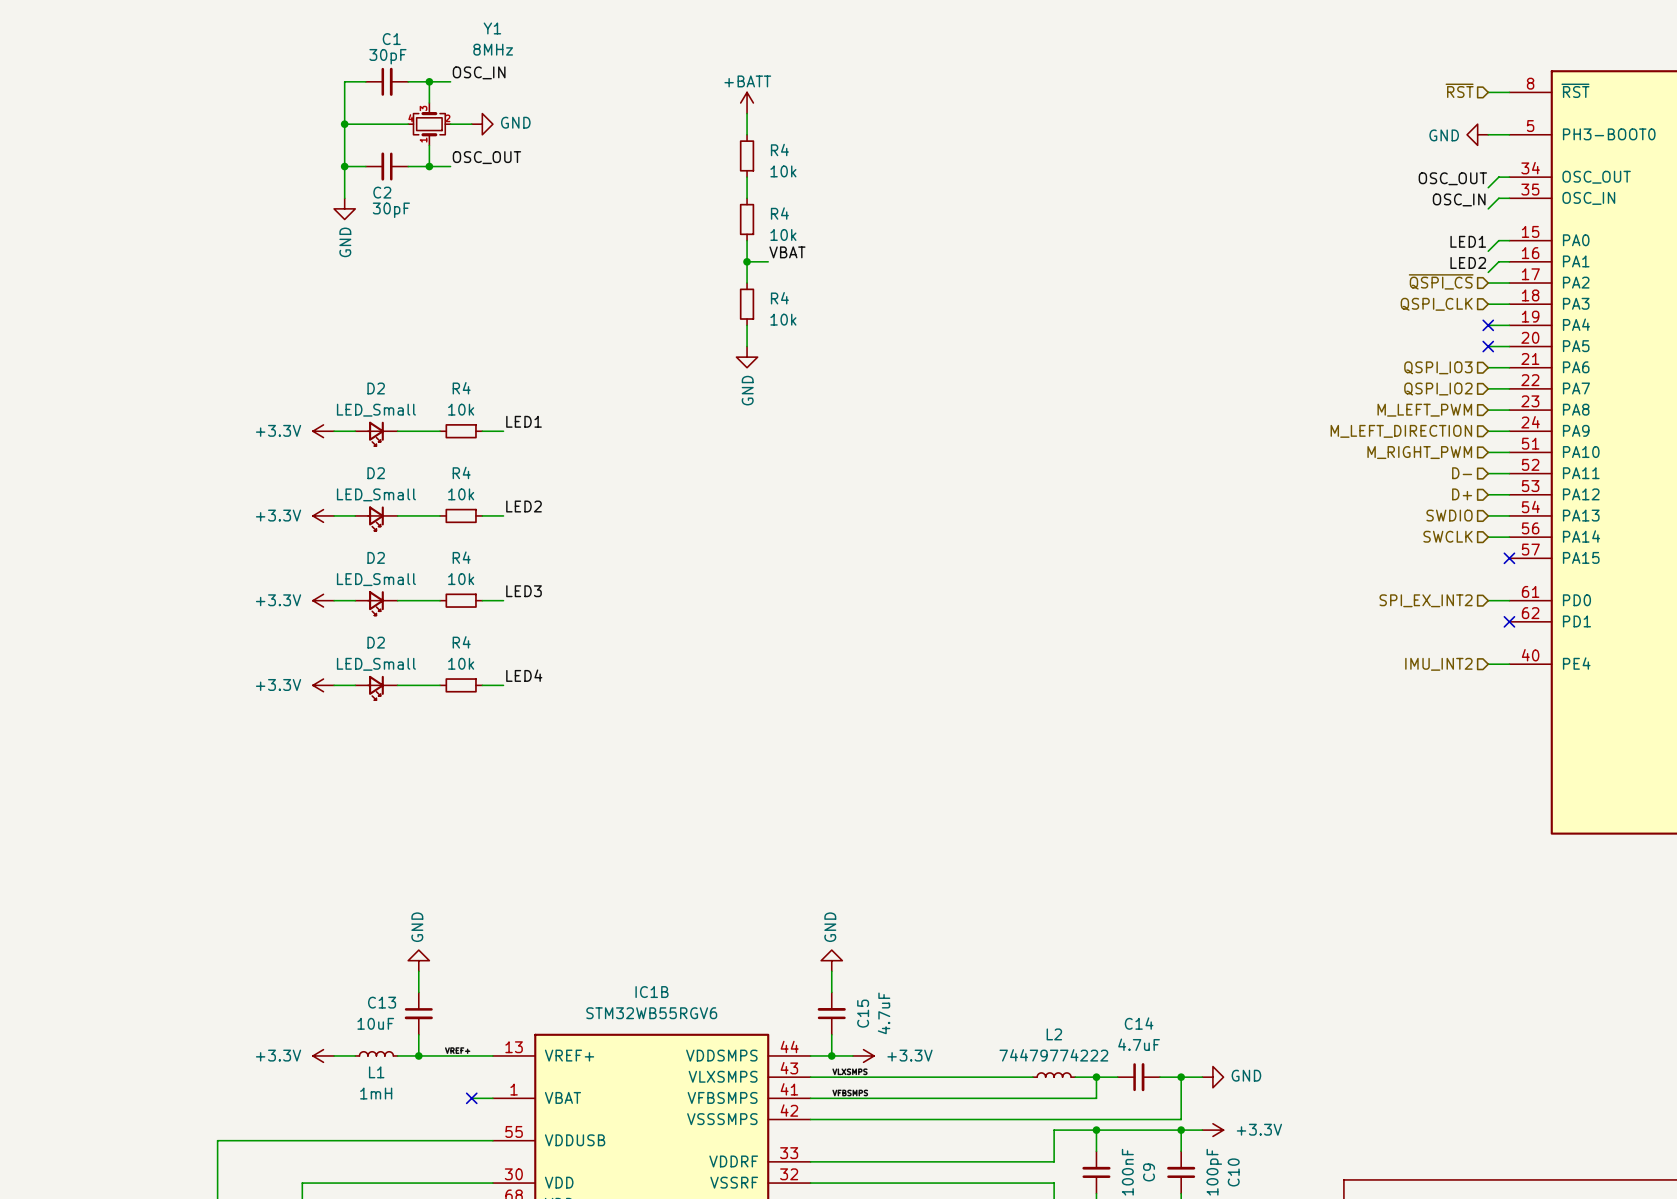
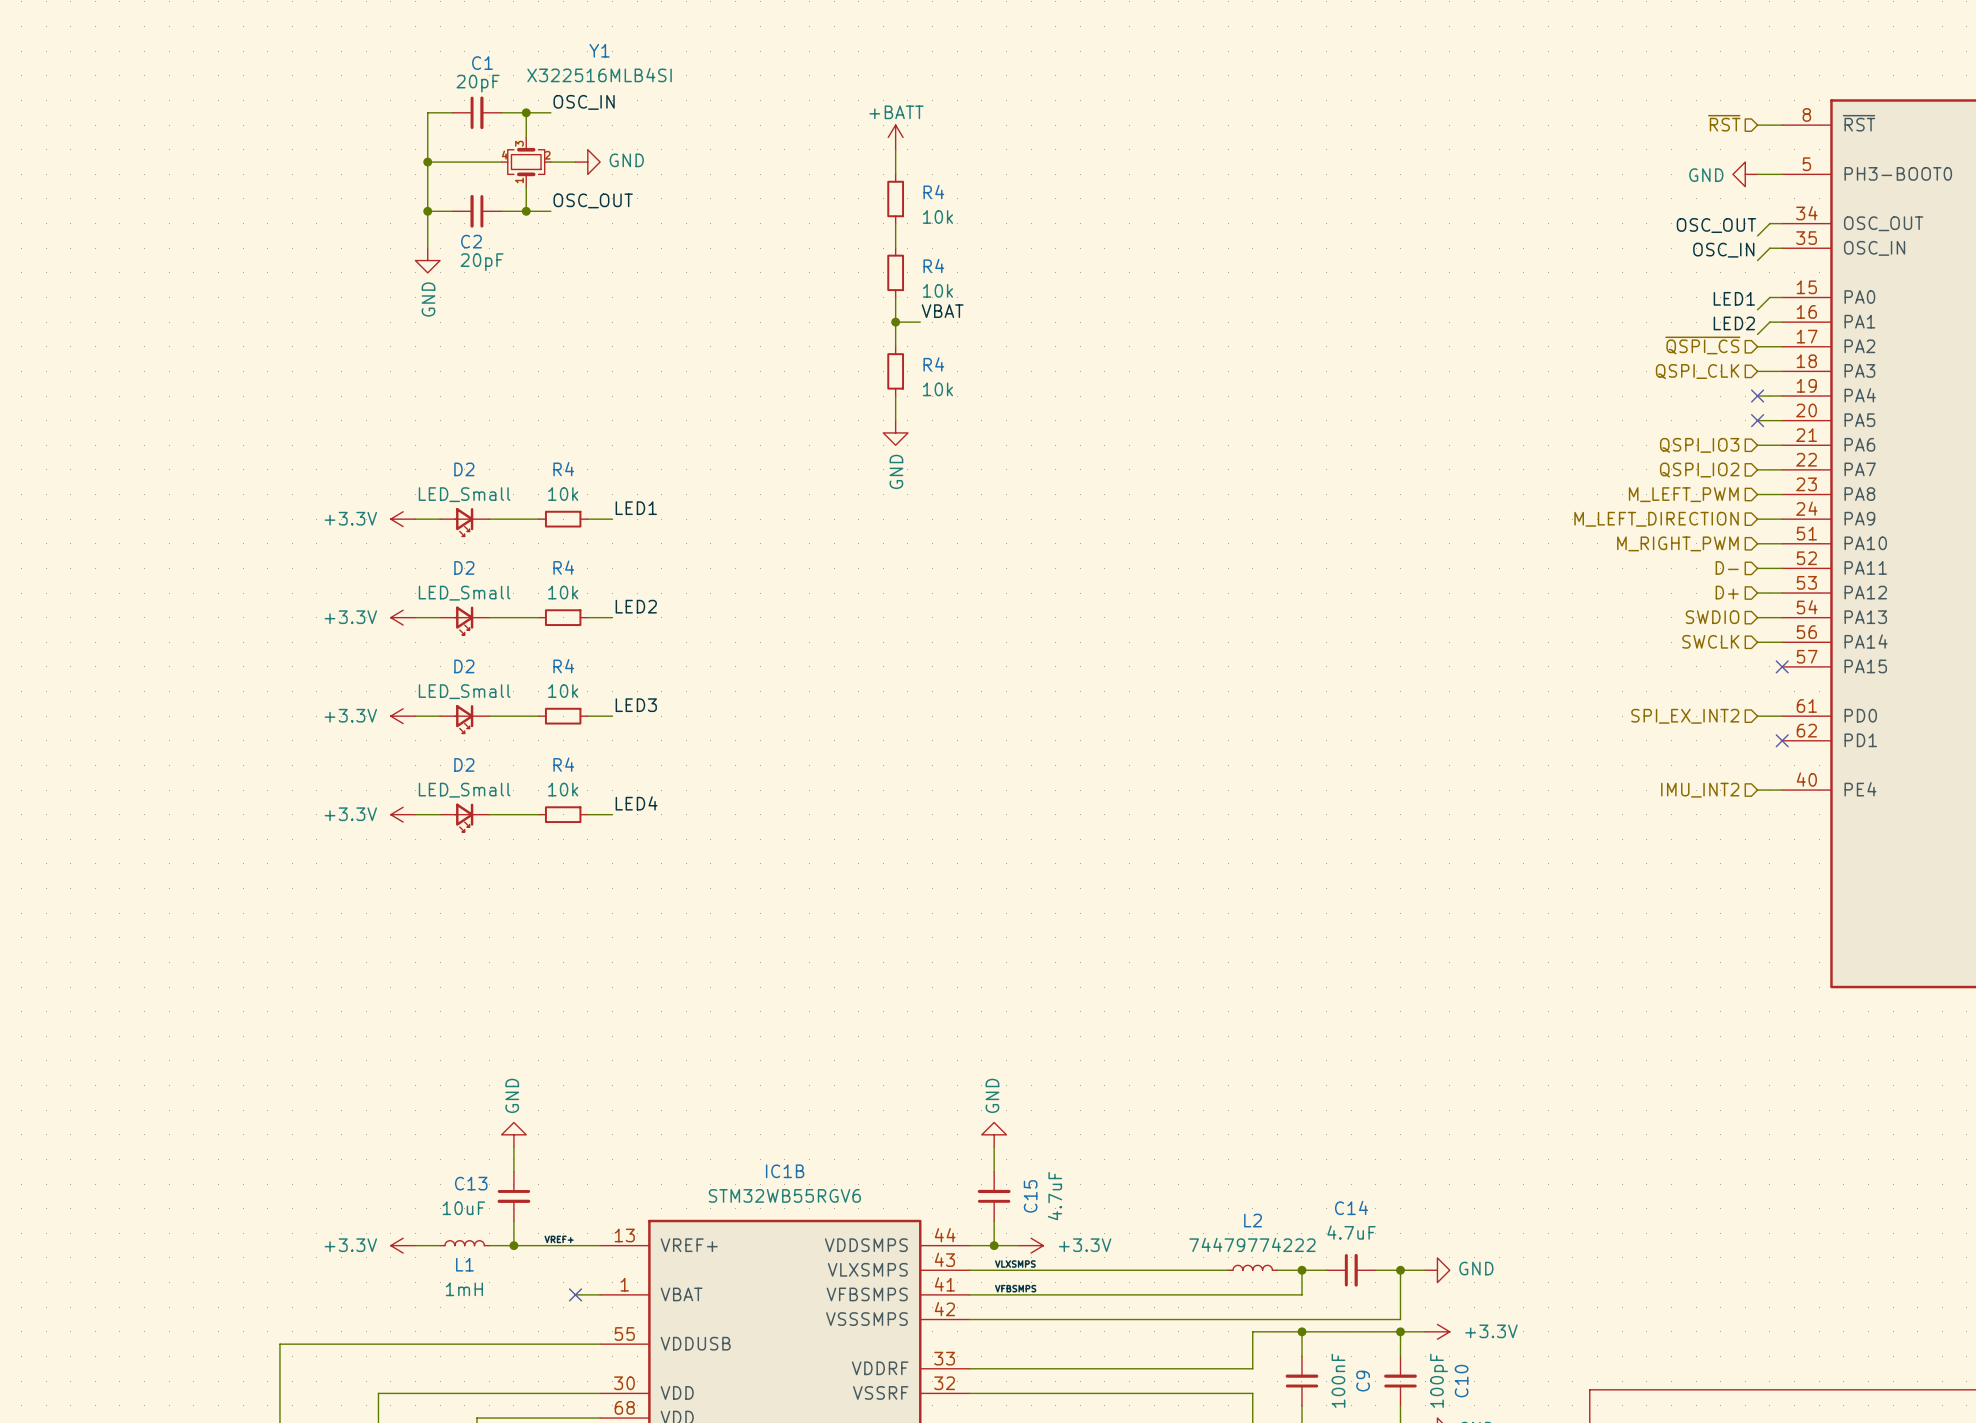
Y1 value: 8MHz (493, 49) -> X322516MLB4SI (599, 75)
C1 value: 30pF (387, 56) -> 20pF (478, 83)
C2 value: 30pF (391, 210) -> 20pF (482, 262)

